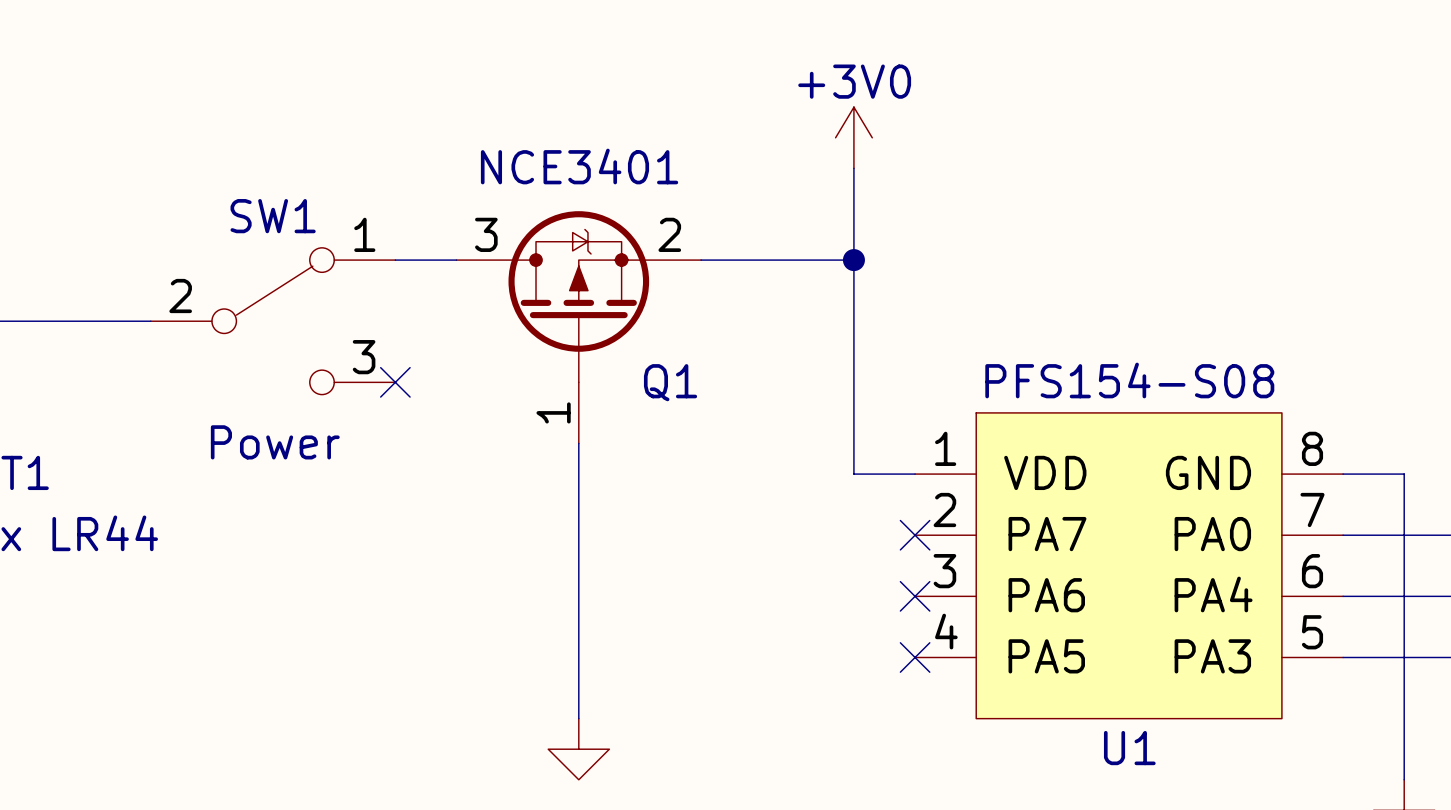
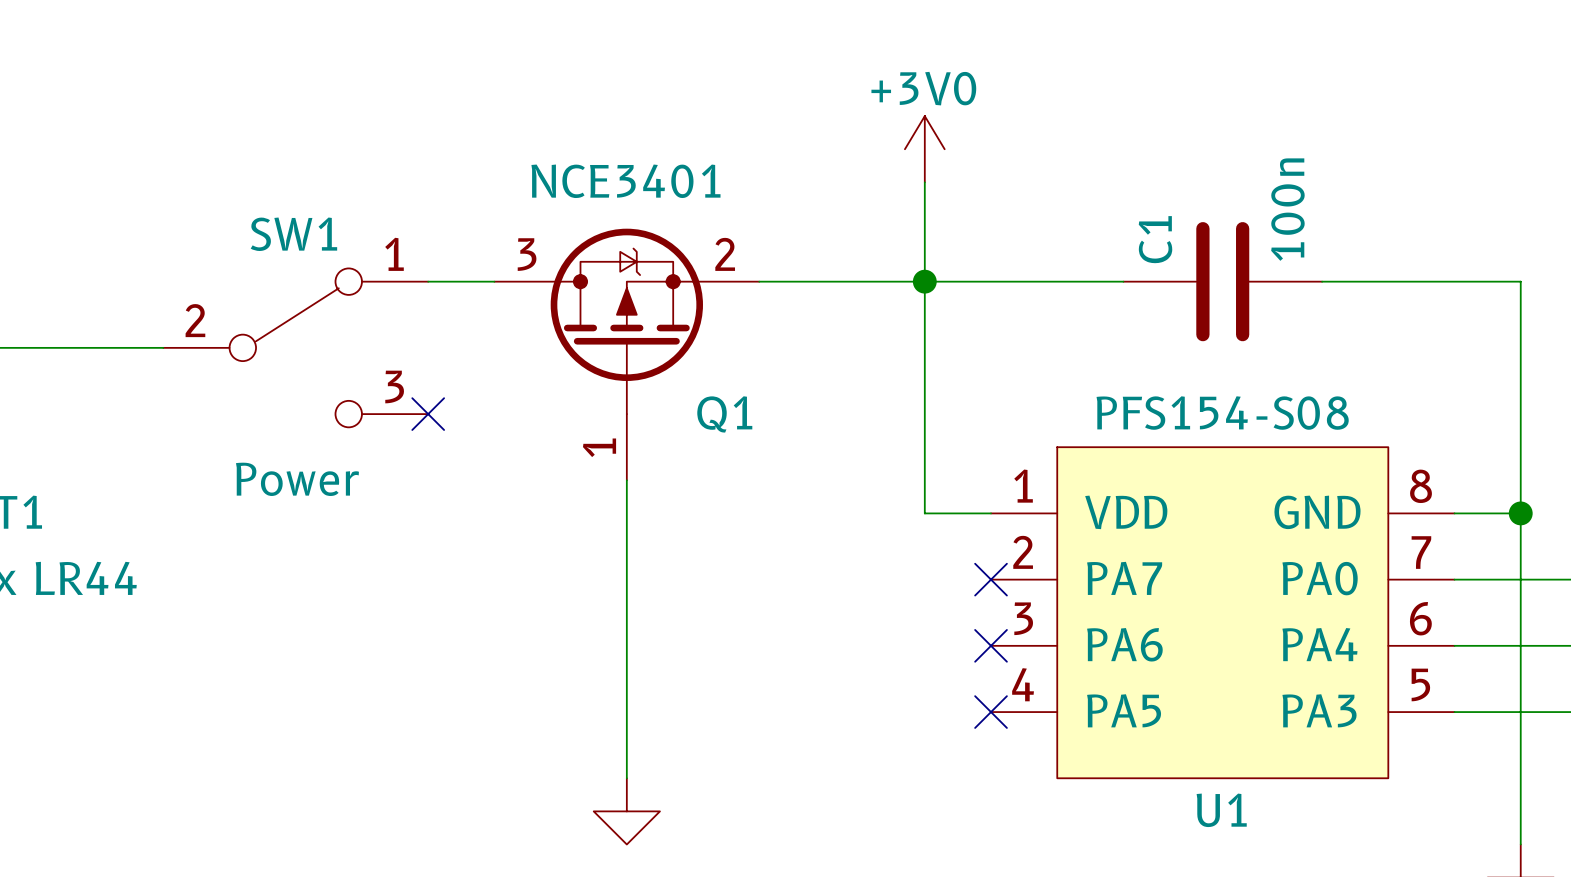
wire: none -> (924, 281) (1123, 281)
C1: none -> 100n (1222, 281)
wire: none -> (1322, 281) (1520, 281) (1520, 513)
junction: none -> (1520, 513)

